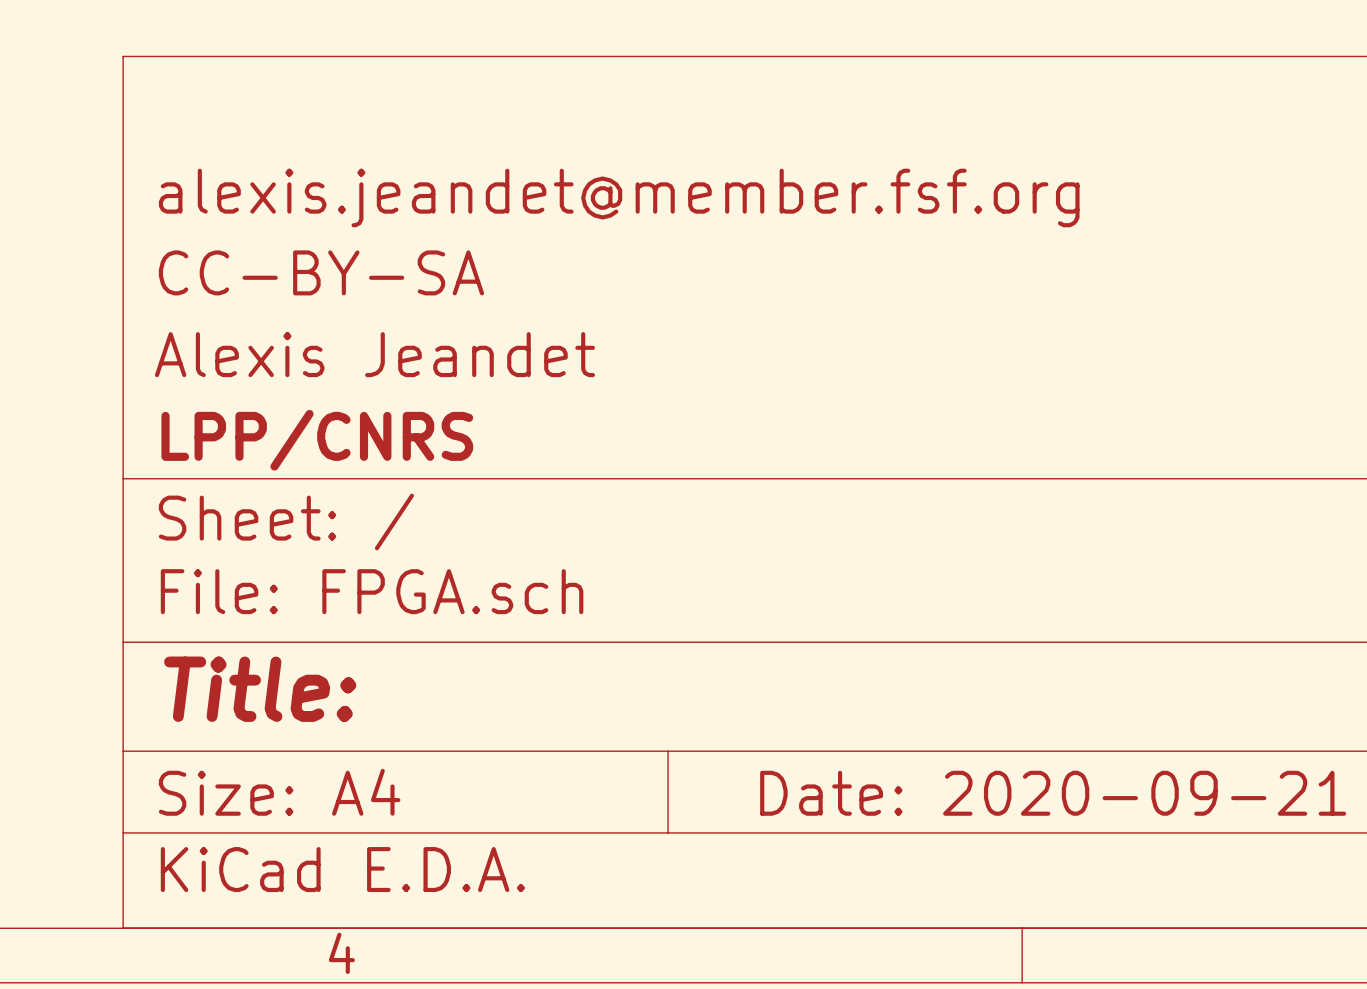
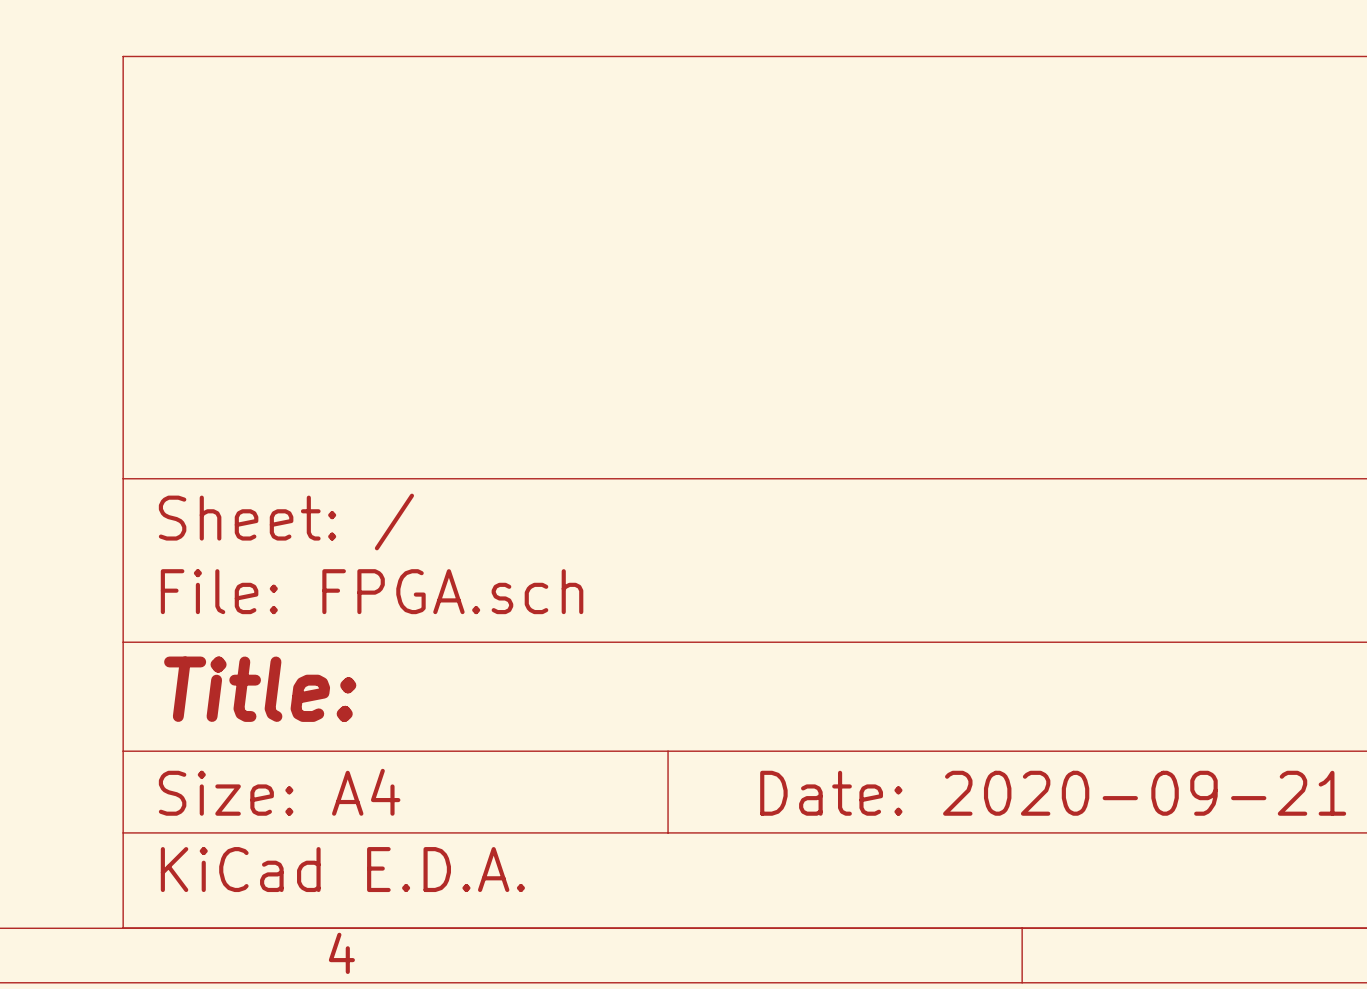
title block: alexis.jeandet@member.fsf.org (619, 197) -> none
title block: CC-BY-SA (321, 272) -> none
title block: Alexis Jeandet (374, 354) -> none
title block: LPP/CNRS (317, 440) -> none

